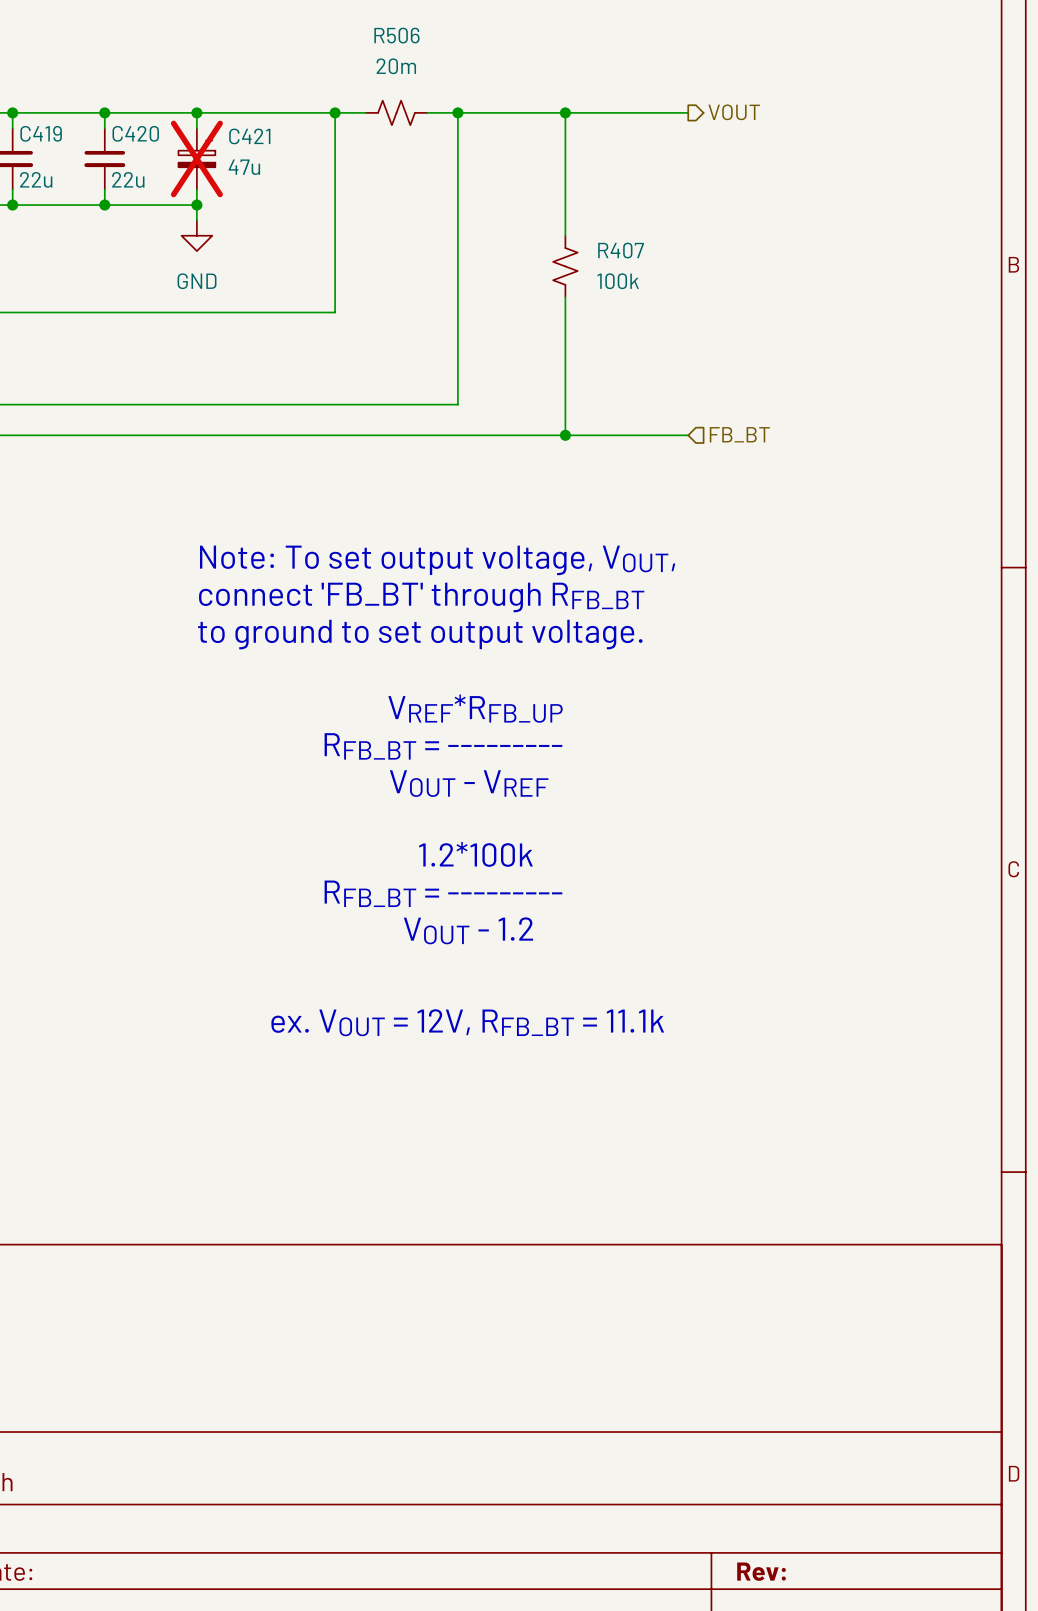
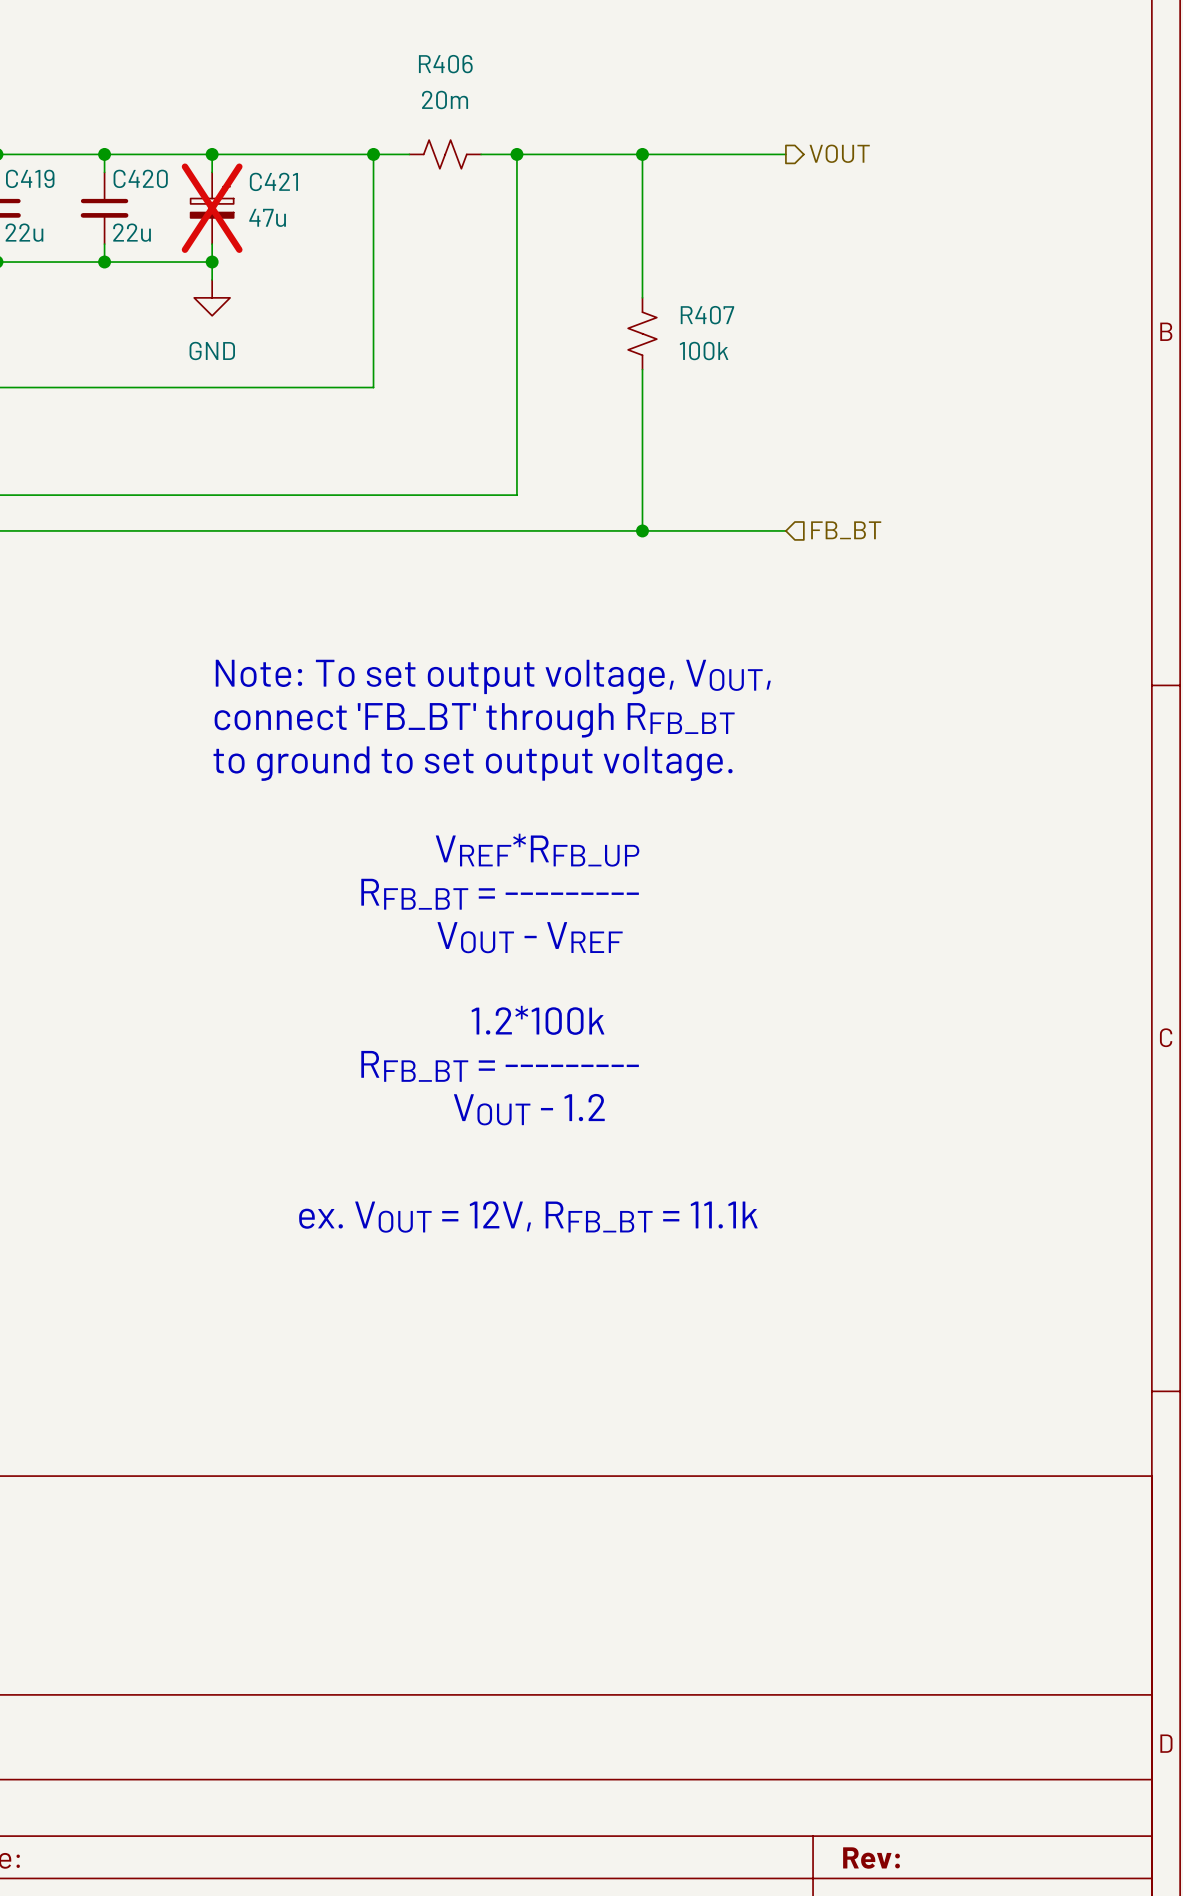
R506 name: R506 (396, 35) -> R406 (445, 64)

